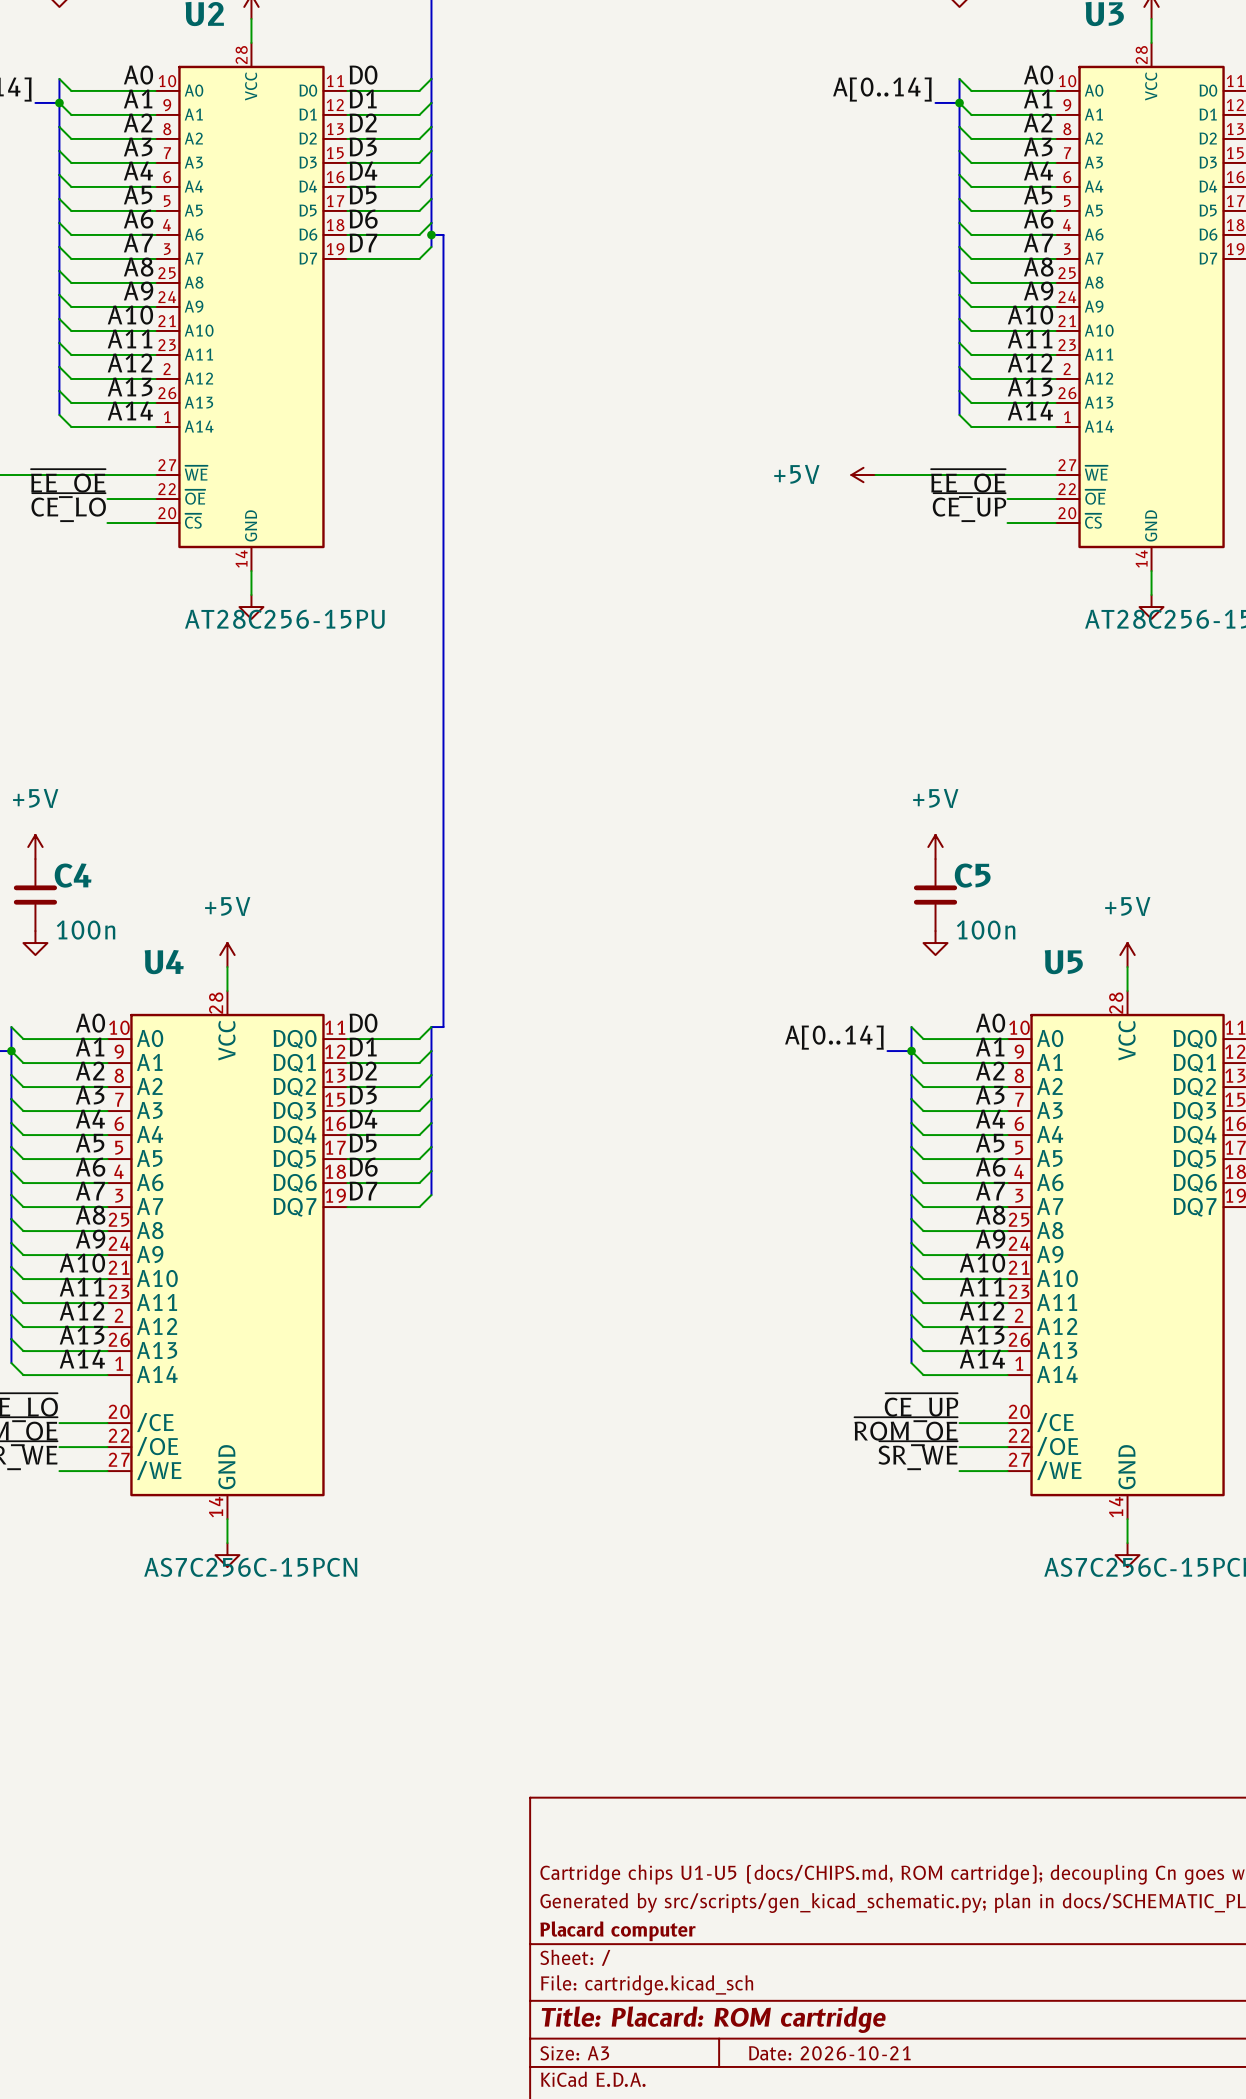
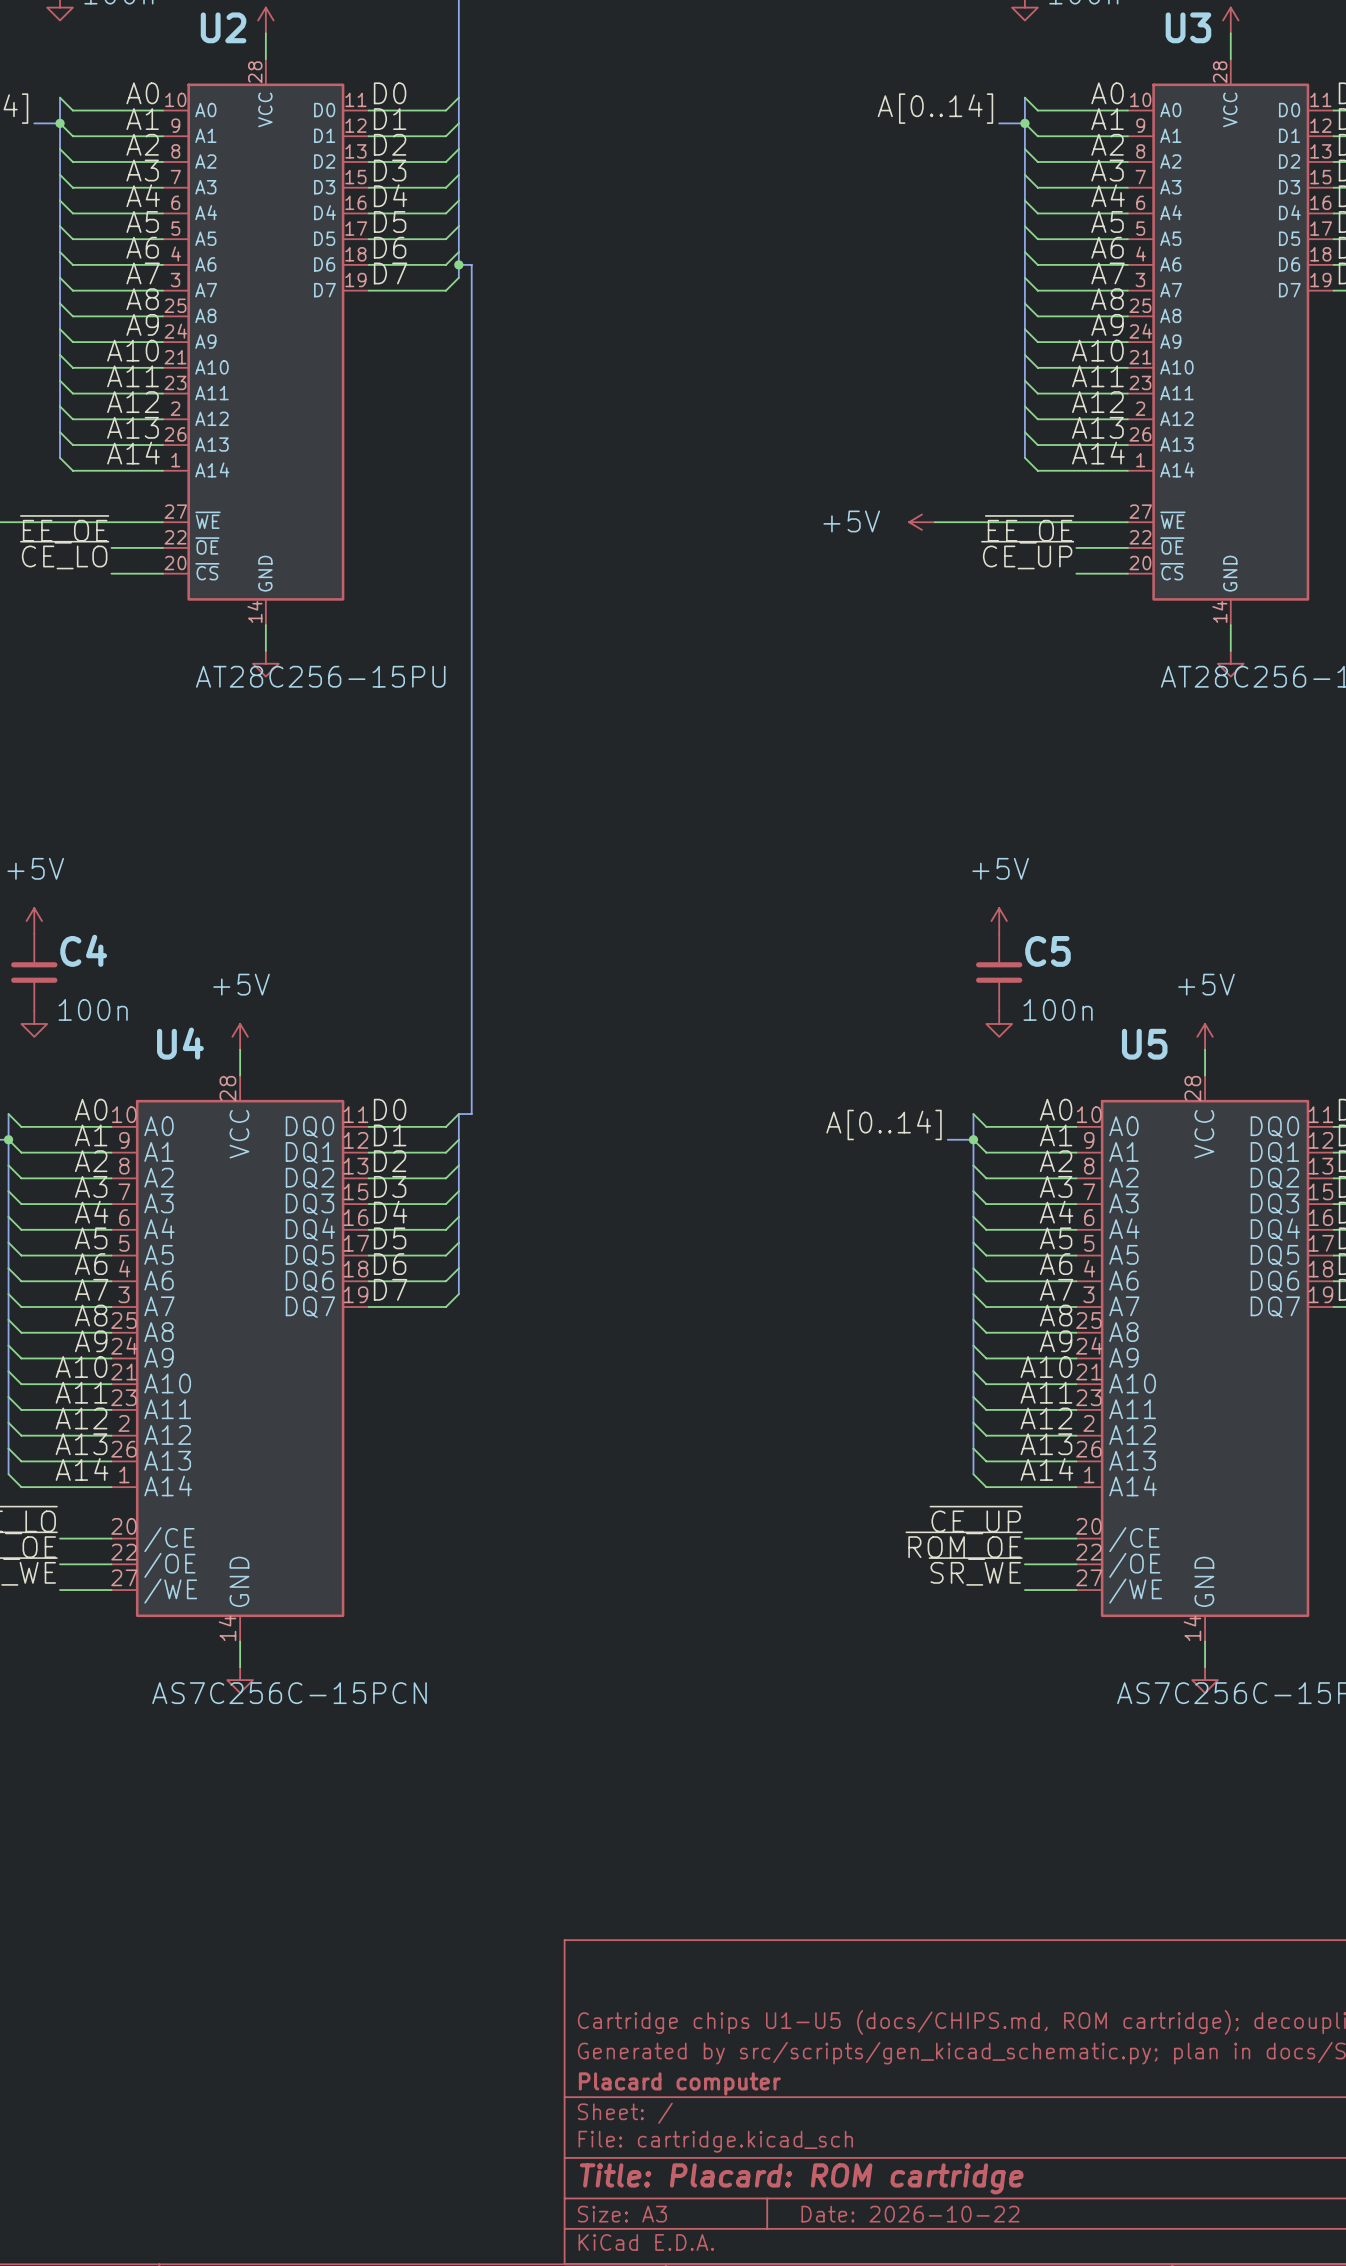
title block: Date: 2026-10-21 (829, 2053) -> Date: 2026-10-22 (910, 2214)

